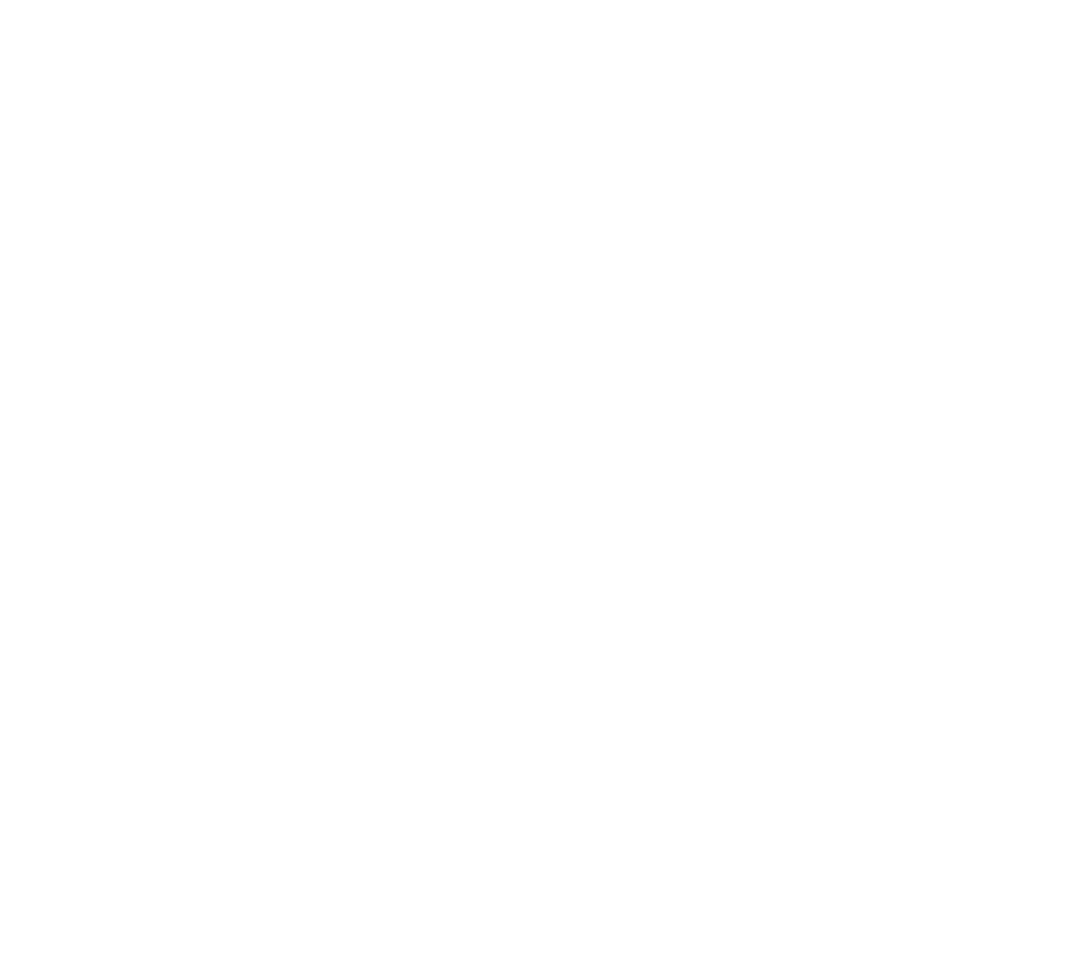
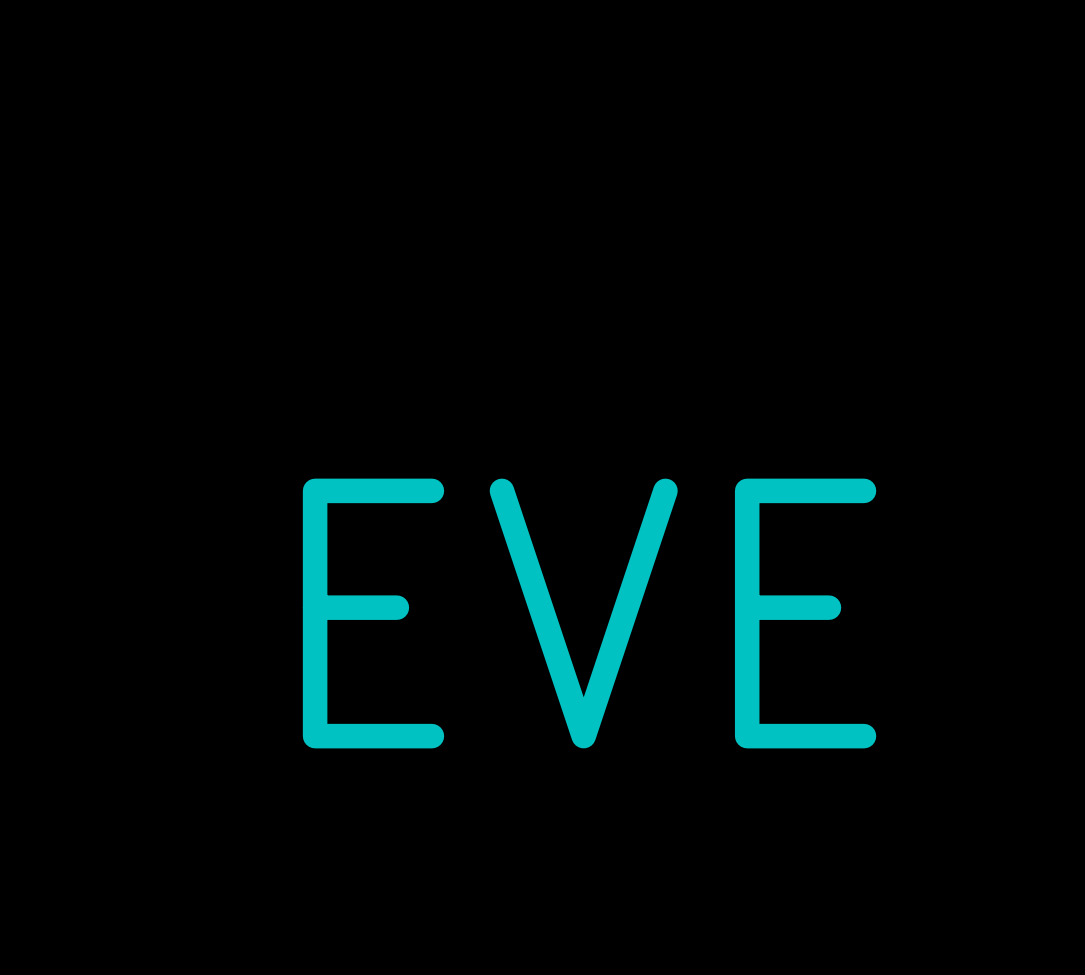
text: none -> EVE (589, 613)

